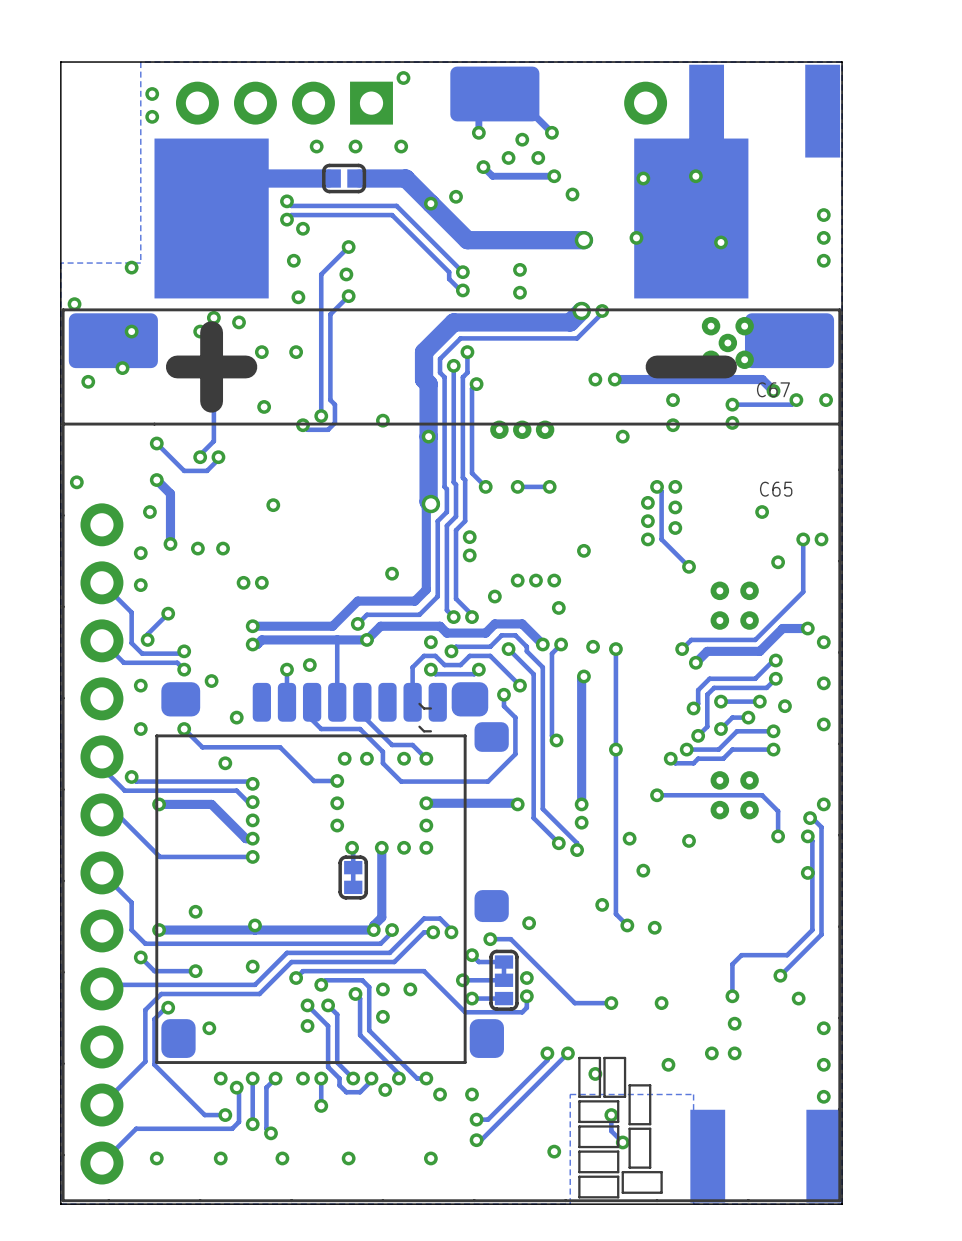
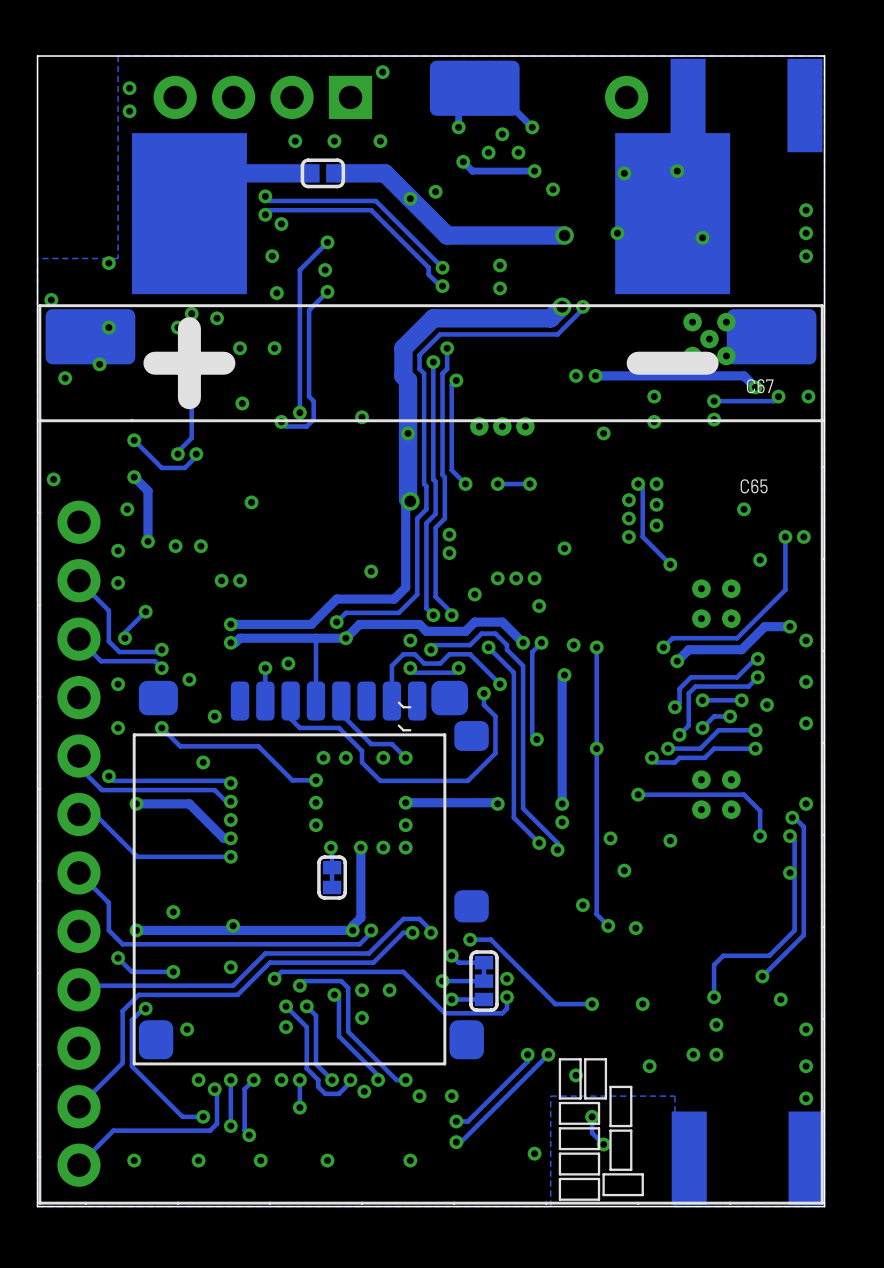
via: (529, 923) -> none

